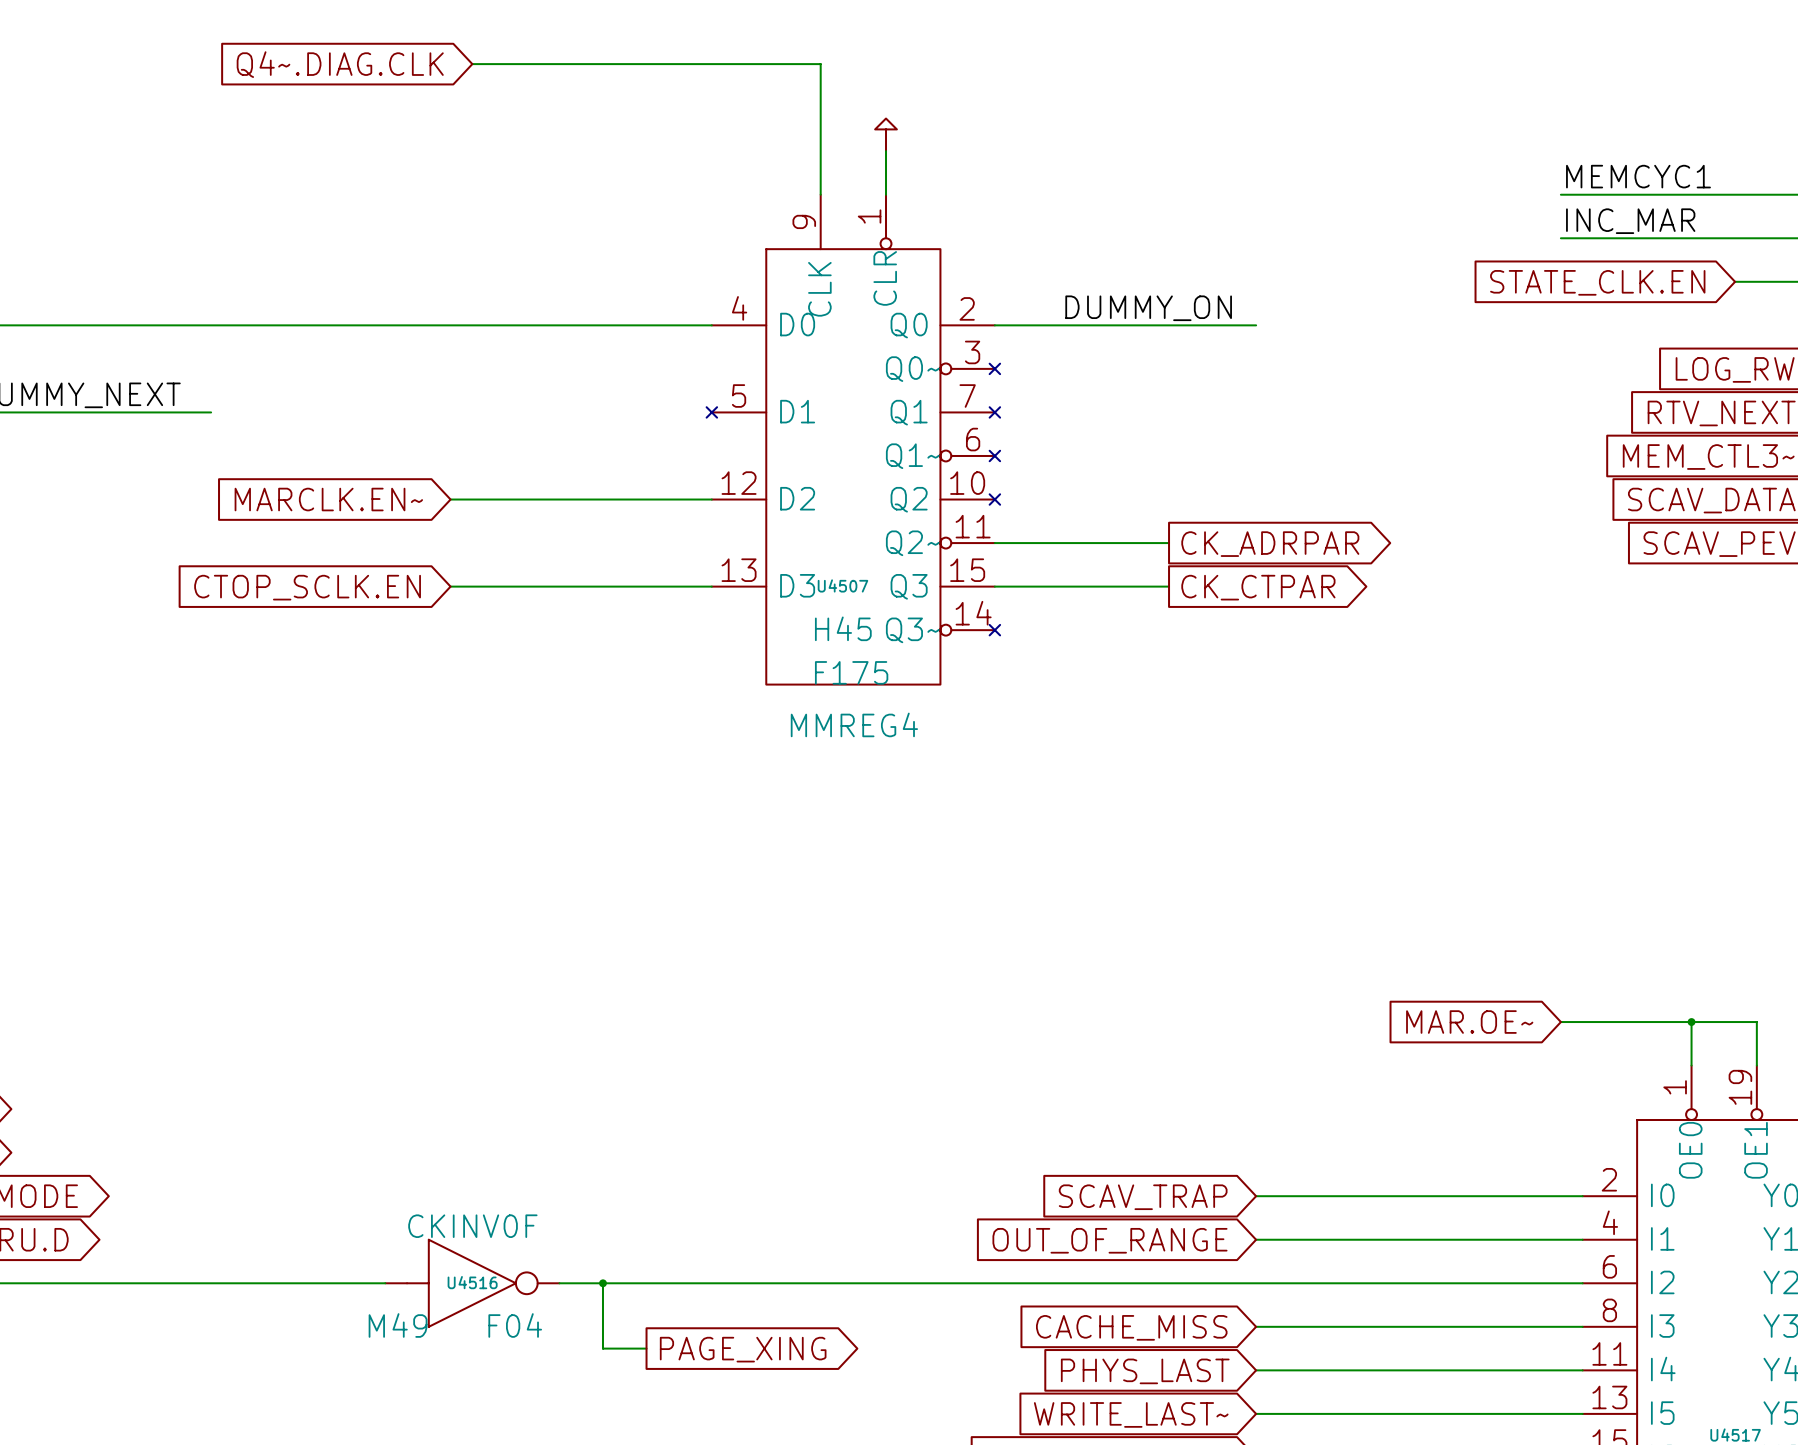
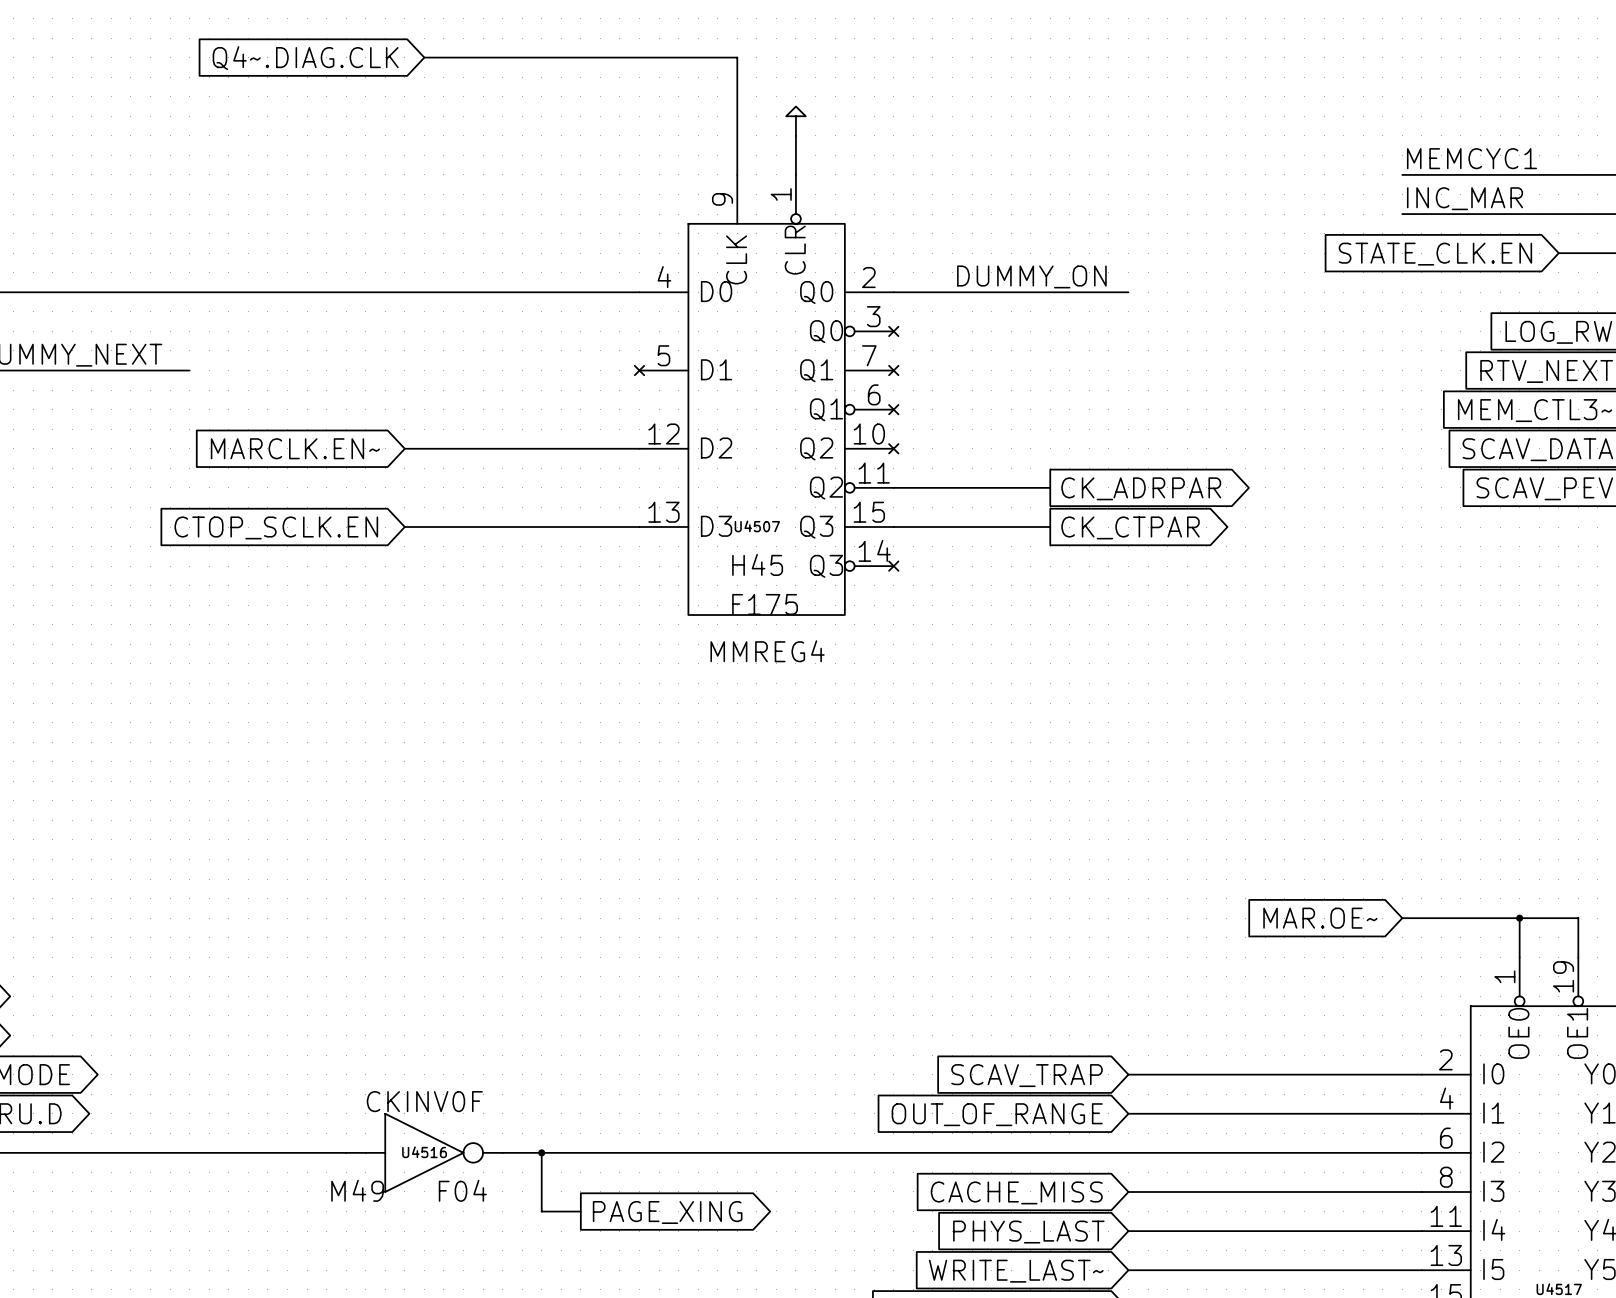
U4507 pin name: Q0~ (912, 369) -> Q0 (826, 331)
U4507 pin name: Q1~ (912, 456) -> Q1 (826, 409)
U4507 pin name: Q2~ (912, 543) -> Q2 (826, 488)
U4507 pin name: Q3~ (912, 630) -> Q3 (826, 566)

